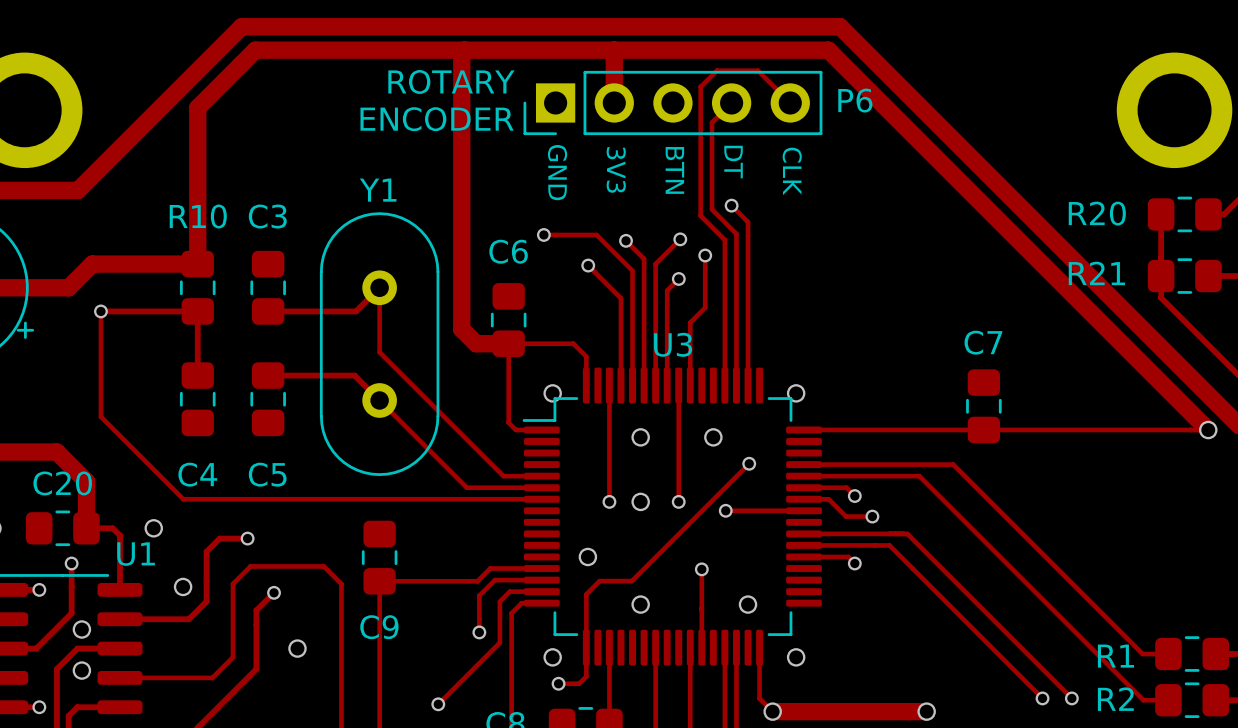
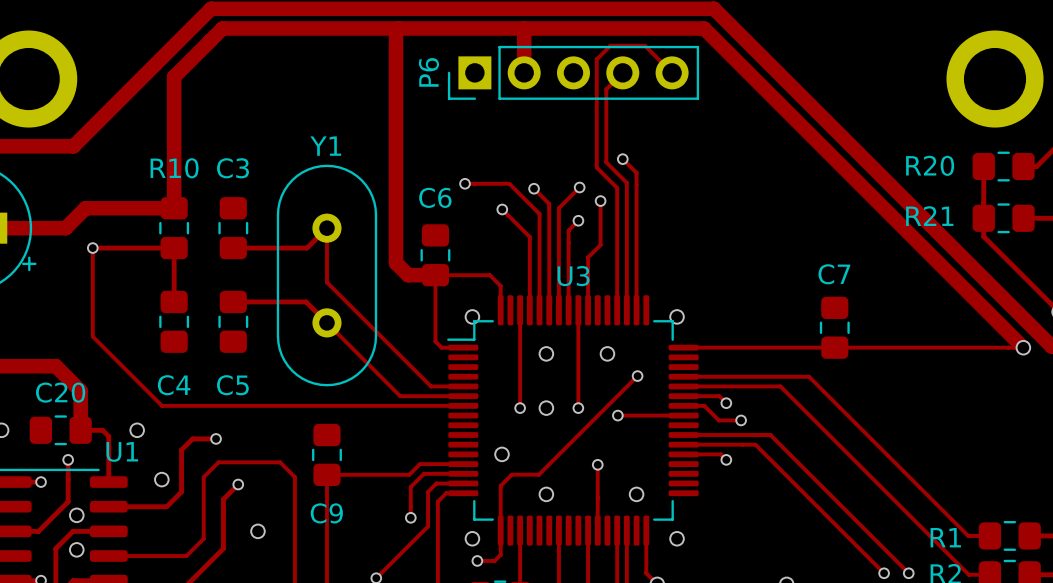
text: ROTARY (451, 81) -> none
P6 name rotation: 0° (855, 100) -> 90° counterclockwise (428, 72)
P6 name position: P6 (855, 100) -> P6 (428, 72)
text: ENCODER (437, 119) -> none
text: DT (733, 162) -> none
text: 3V3 (616, 169) -> none
text: BTN (674, 170) -> none
text: CLK (792, 171) -> none
text: GND (557, 172) -> none

